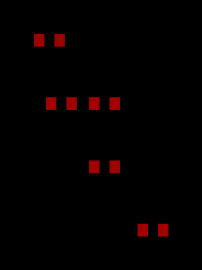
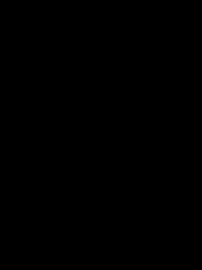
part: (49, 40) -> none
part: (61, 103) -> none
part: (104, 103) -> none
part: (104, 166) -> none
part: (152, 230) -> none

